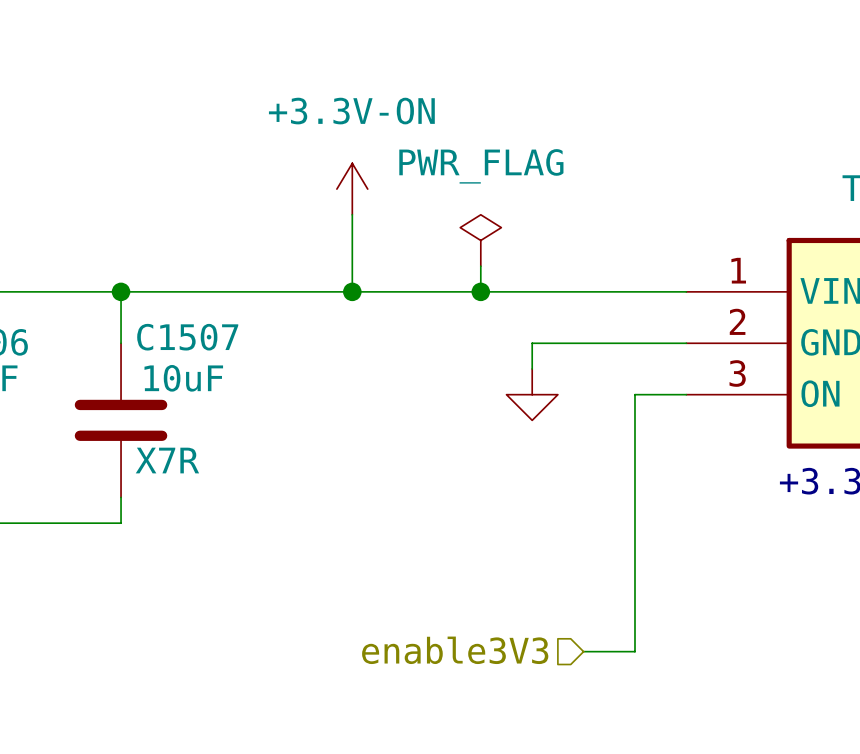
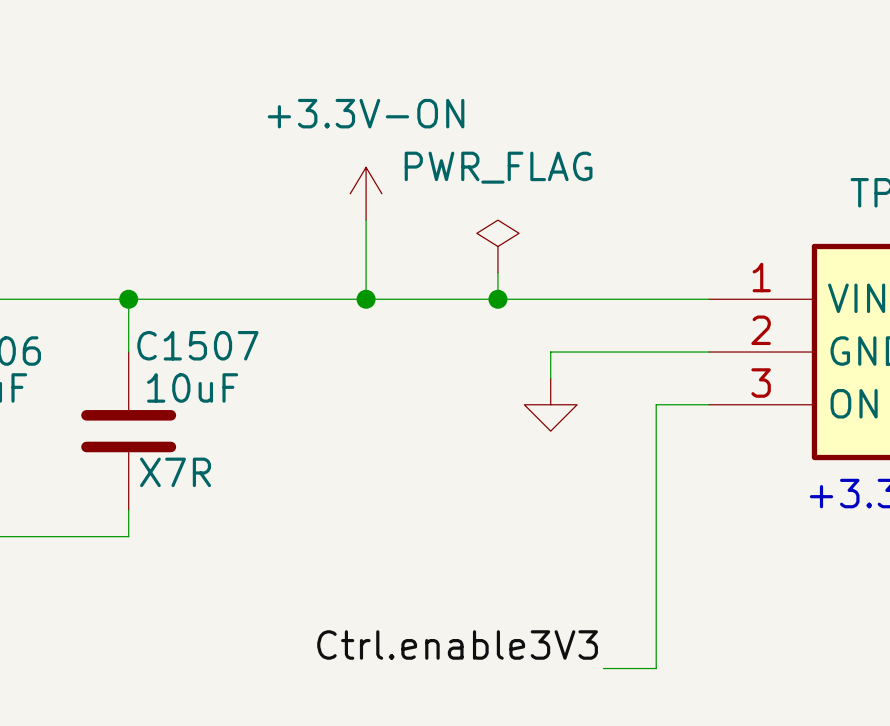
label: none -> Ctrl.enable3V3 (457, 644)
hierarchical label: enable3V3 (455, 650) -> none

